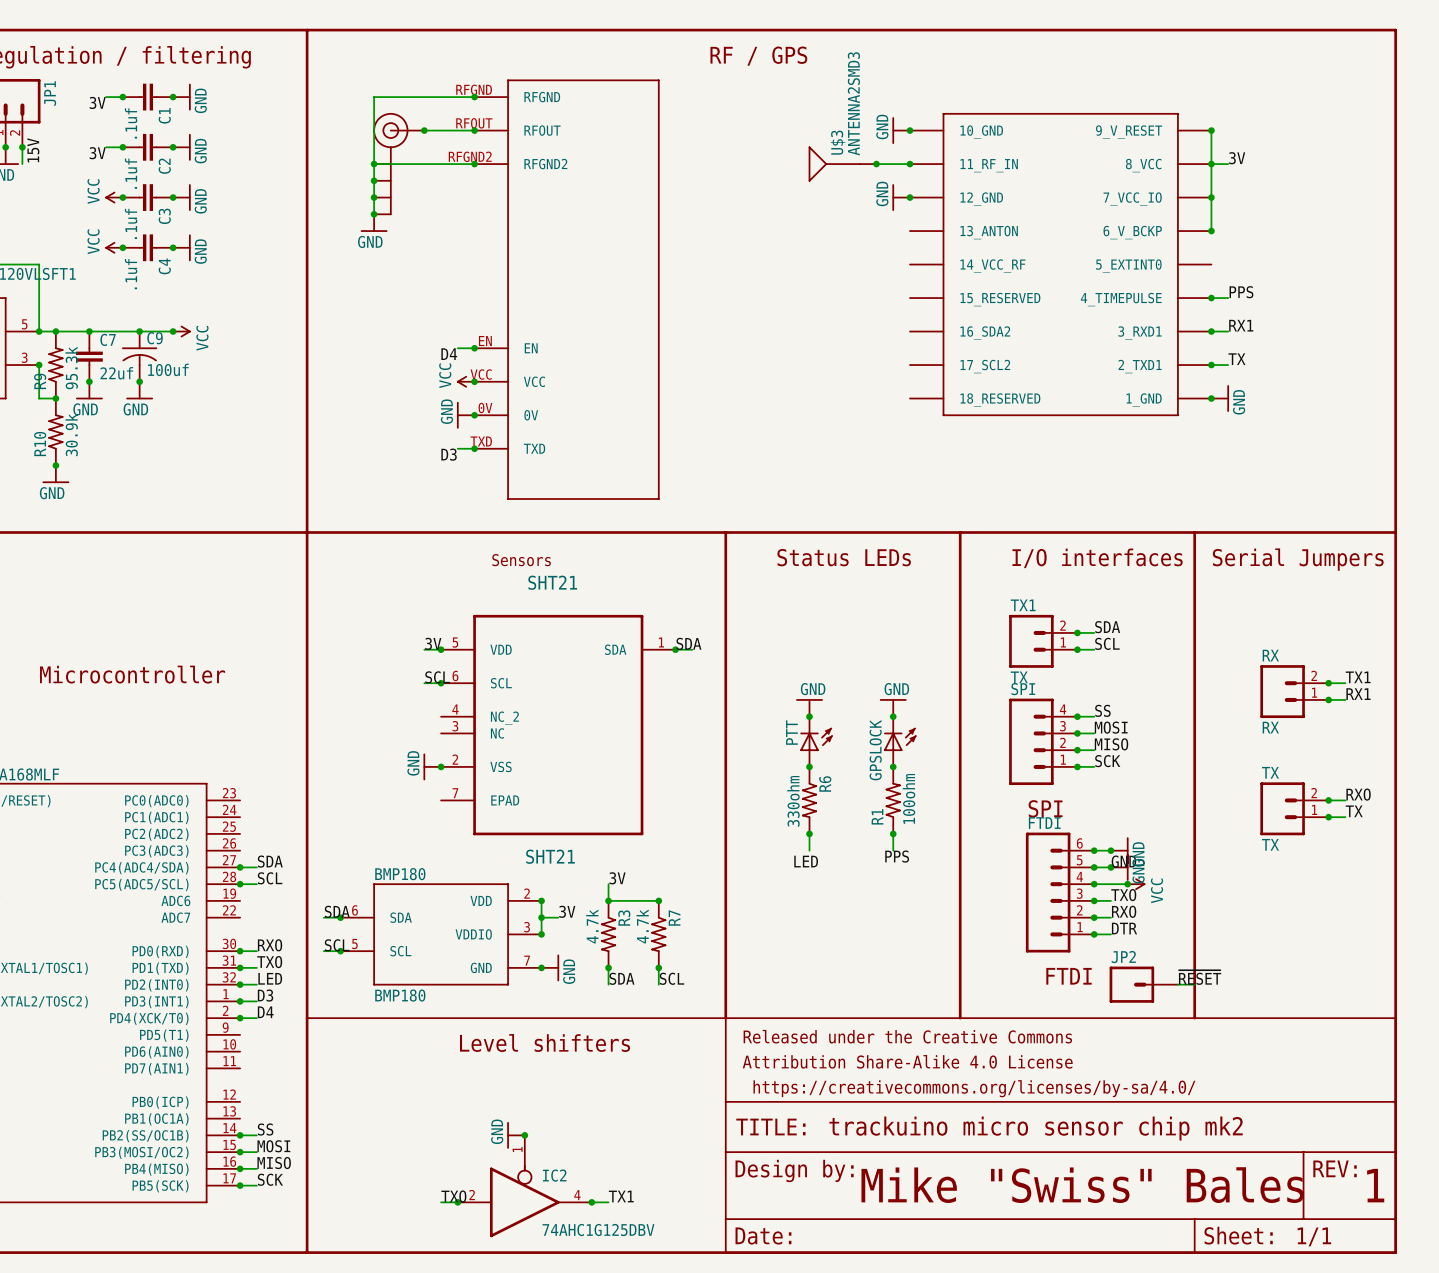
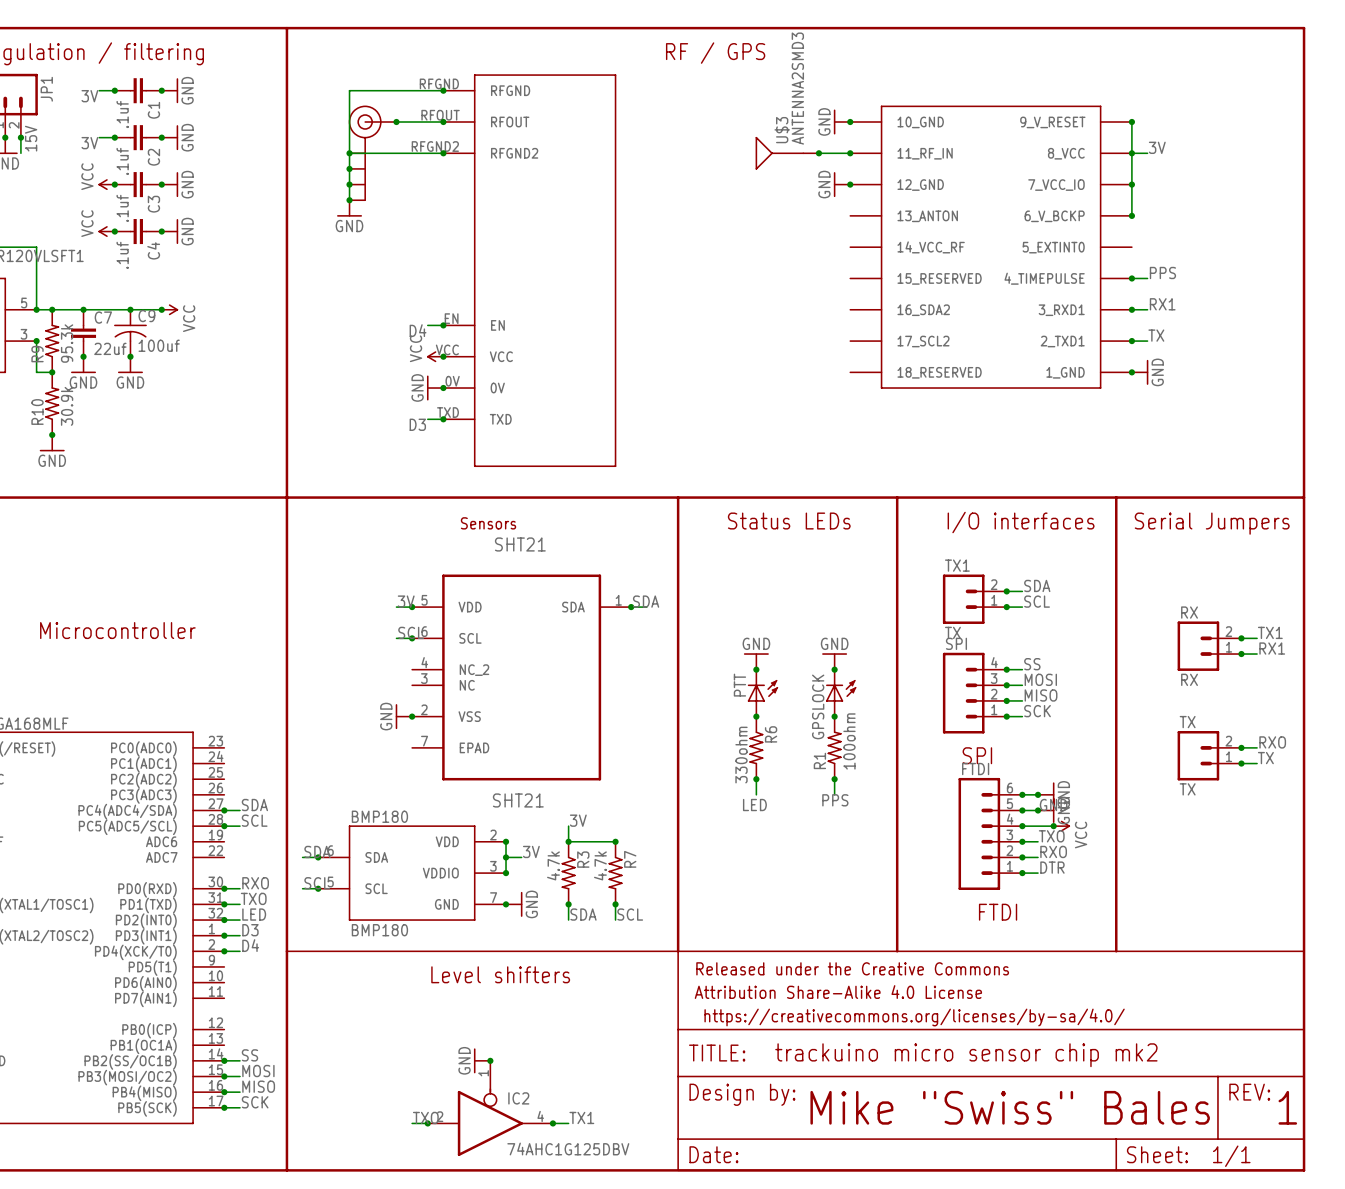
label: ~{RESET} (1200, 977) -> none
JP2: (1143, 984) -> none
wire: (1177, 984) (1194, 984) -> none

